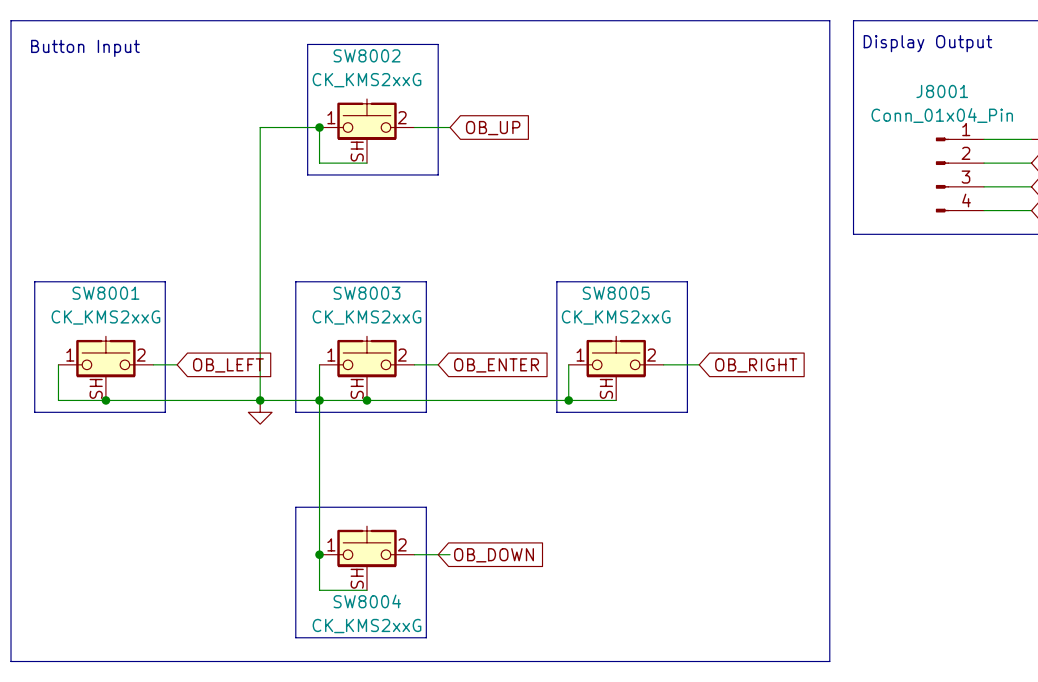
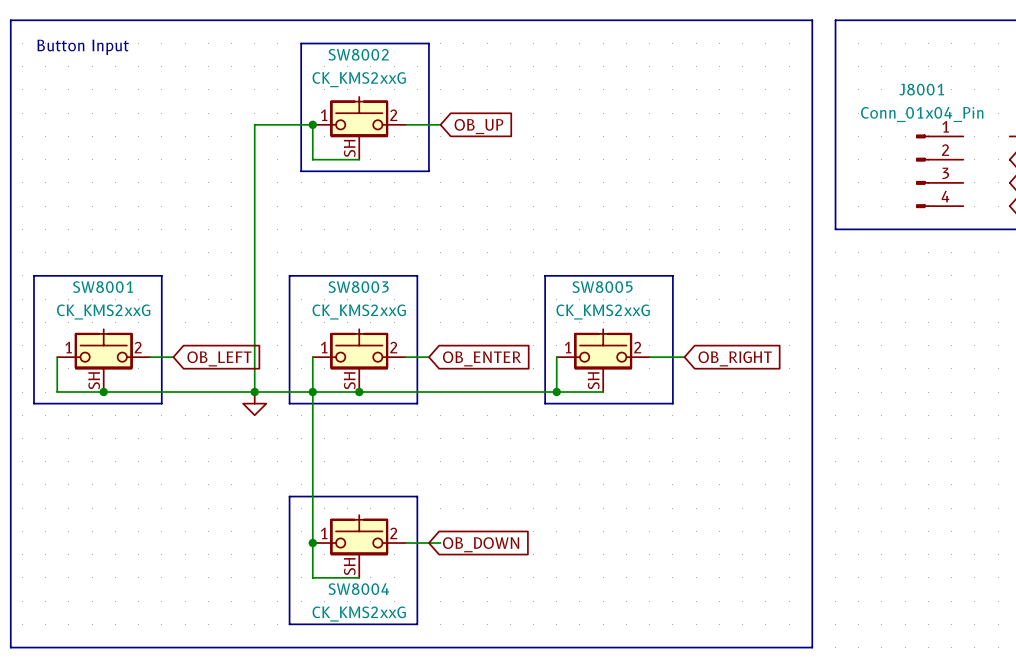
text: Display Output (927, 43) -> none
wire: (984, 139) (1031, 139) -> none
wire: (984, 163) (1031, 163) -> none
wire: (984, 186) (1031, 186) -> none
wire: (984, 210) (1031, 210) -> none

